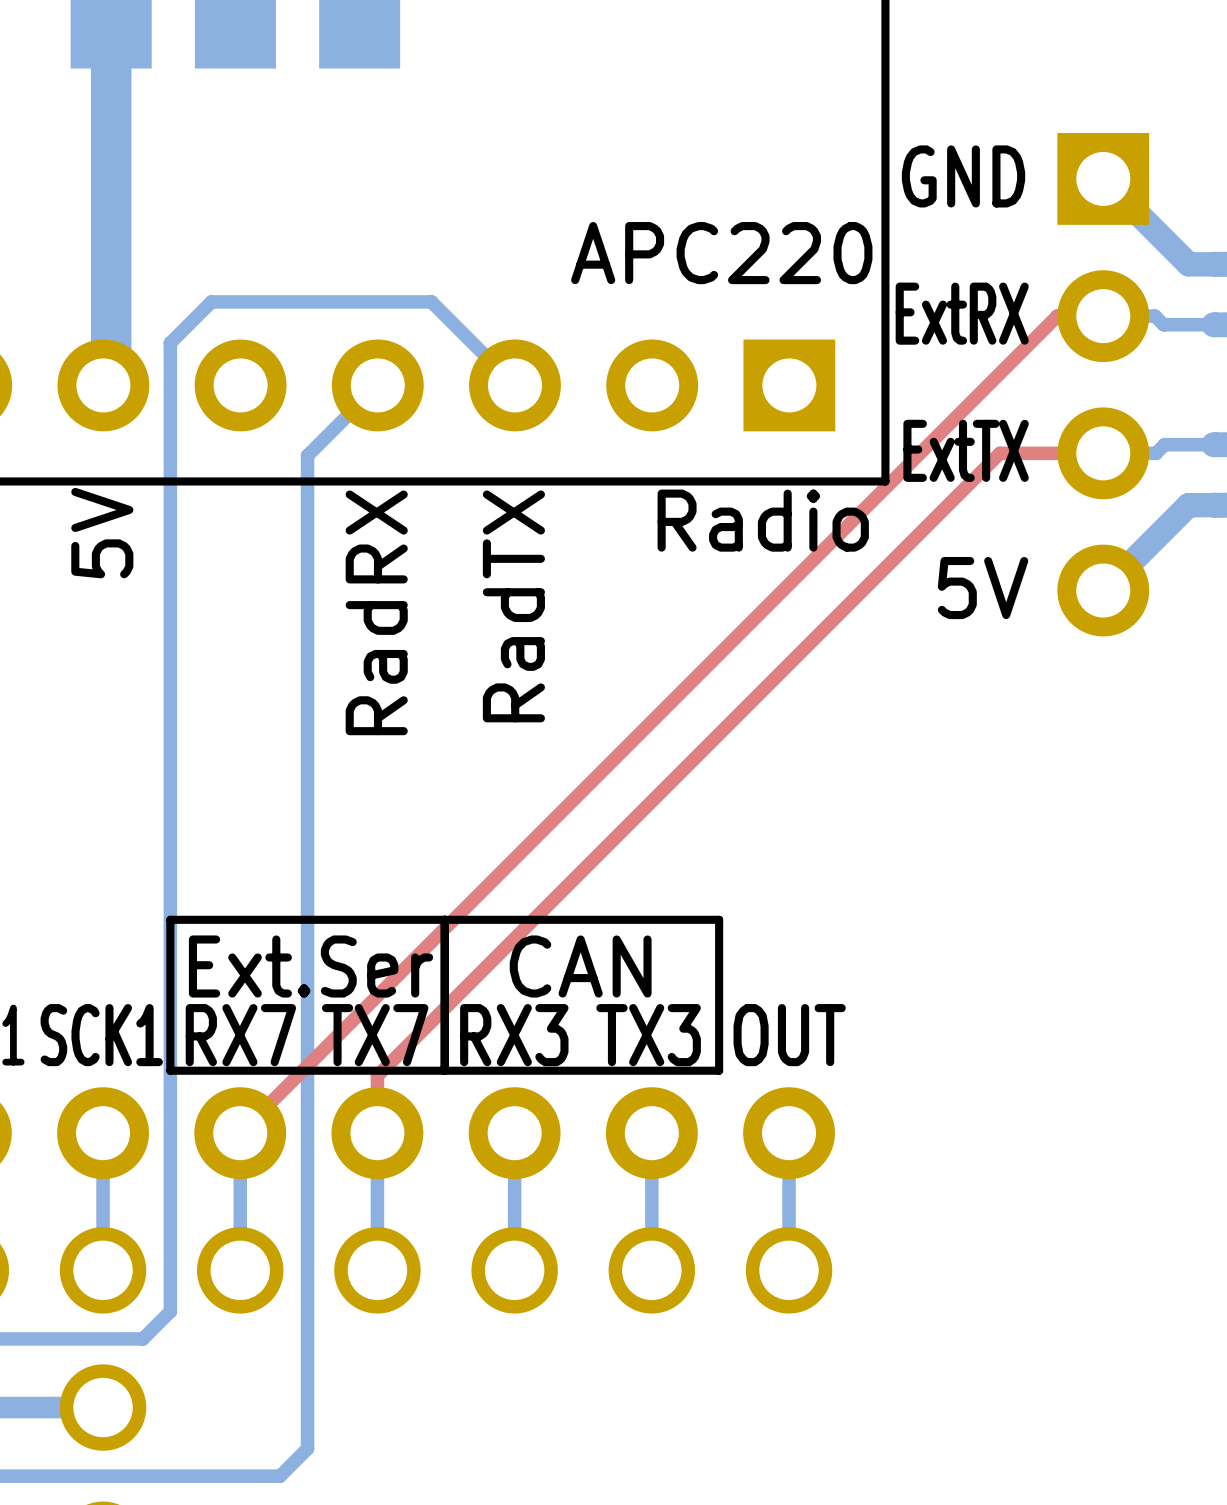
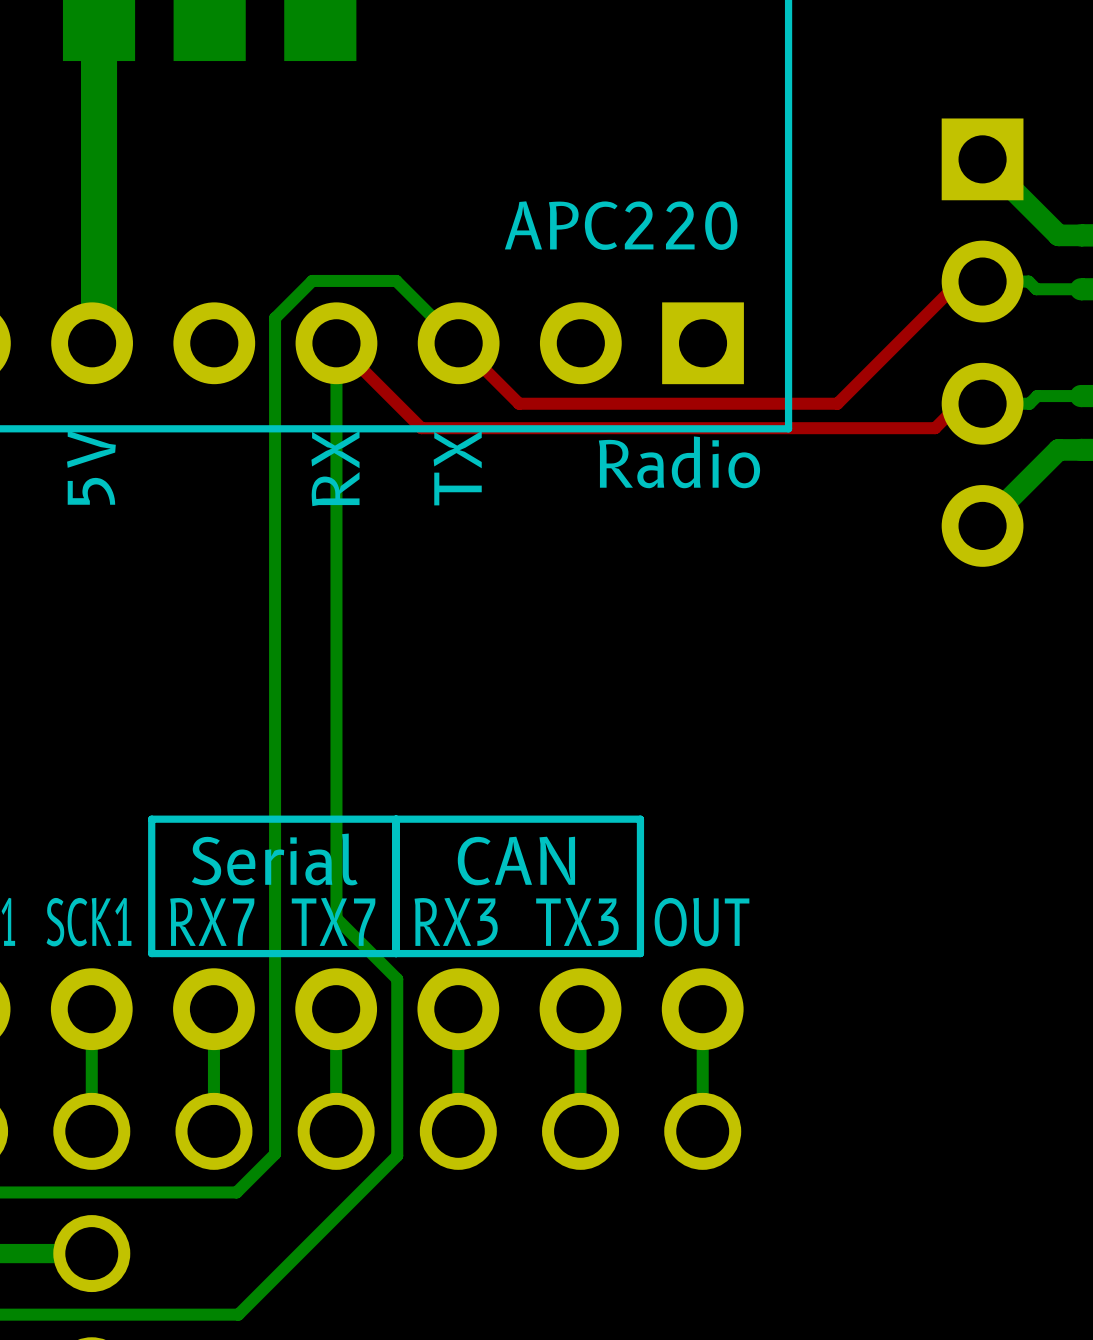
text: GND (963, 176) -> none
text: ExtRX (962, 313) -> none
bottom track: (445, 315) (431, 301) (211, 301) (170, 343) (170, 1311) (142, 1338) -> (396, 280) (312, 280) (275, 318) (275, 1154) (236, 1192) (127, 1192)
top track: (1077, 316) (1057, 316) (240, 1133) -> (959, 281) (837, 403) (519, 403) (458, 343)
bottom track: (377, 385) (307, 455) (307, 1448) (280, 1476) (267, 1476) -> (336, 343) (336, 918) (397, 979) (397, 1155) (238, 1314)
text: ExtTX (966, 450) -> none
top track: (1077, 453) (999, 453) (377, 1075) (377, 1133) -> (959, 403) (935, 428) (421, 428) (336, 343)
text: 5V (983, 588) -> none
text: RadTX (513, 606) -> TX (457, 468)
text: RadRX (376, 612) -> RX (335, 468)
text: Ext.Ser (311, 966) -> Serial (274, 859)

